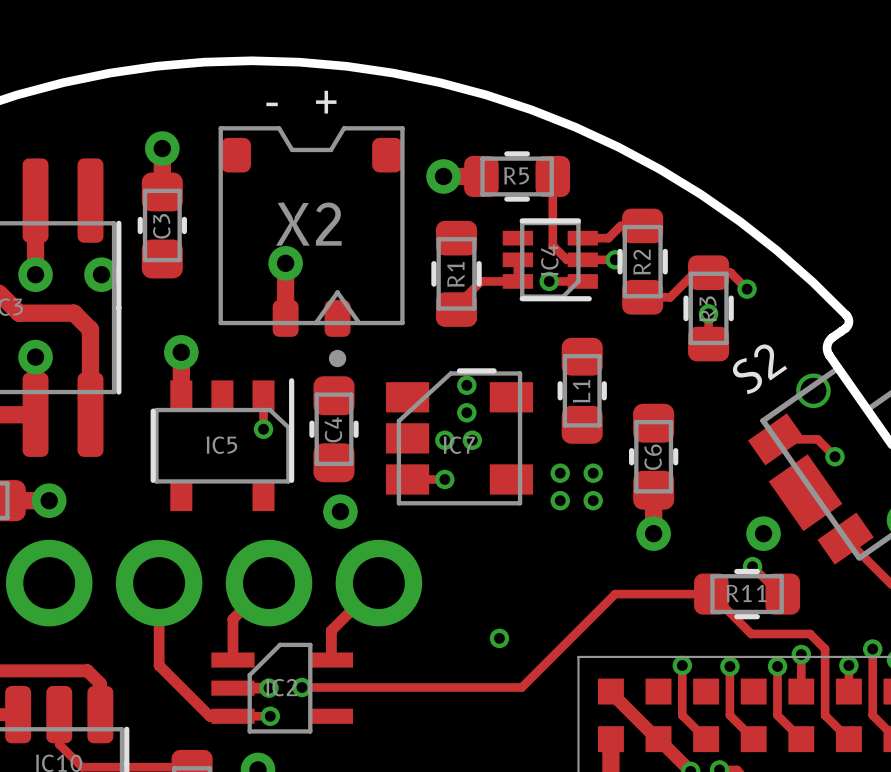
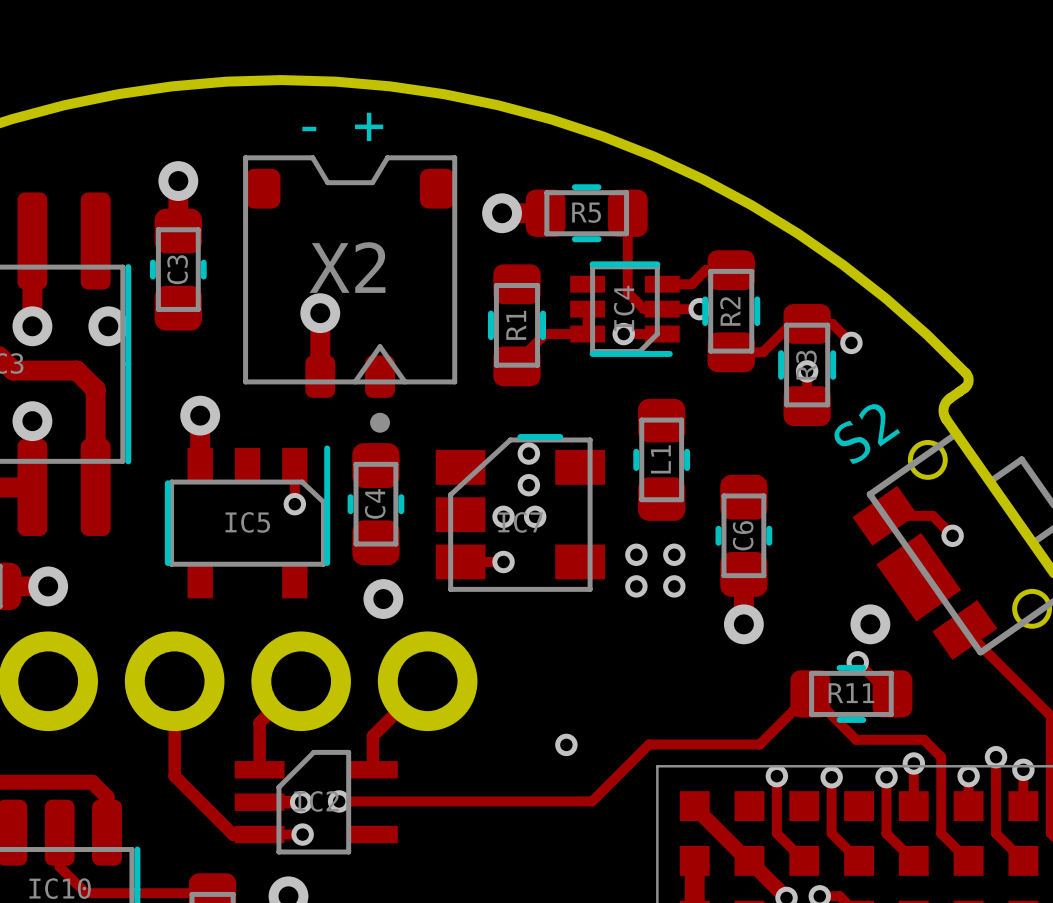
track: (711, 594) (615, 594) (571, 638) -> (810, 693) (759, 744) (649, 744)

